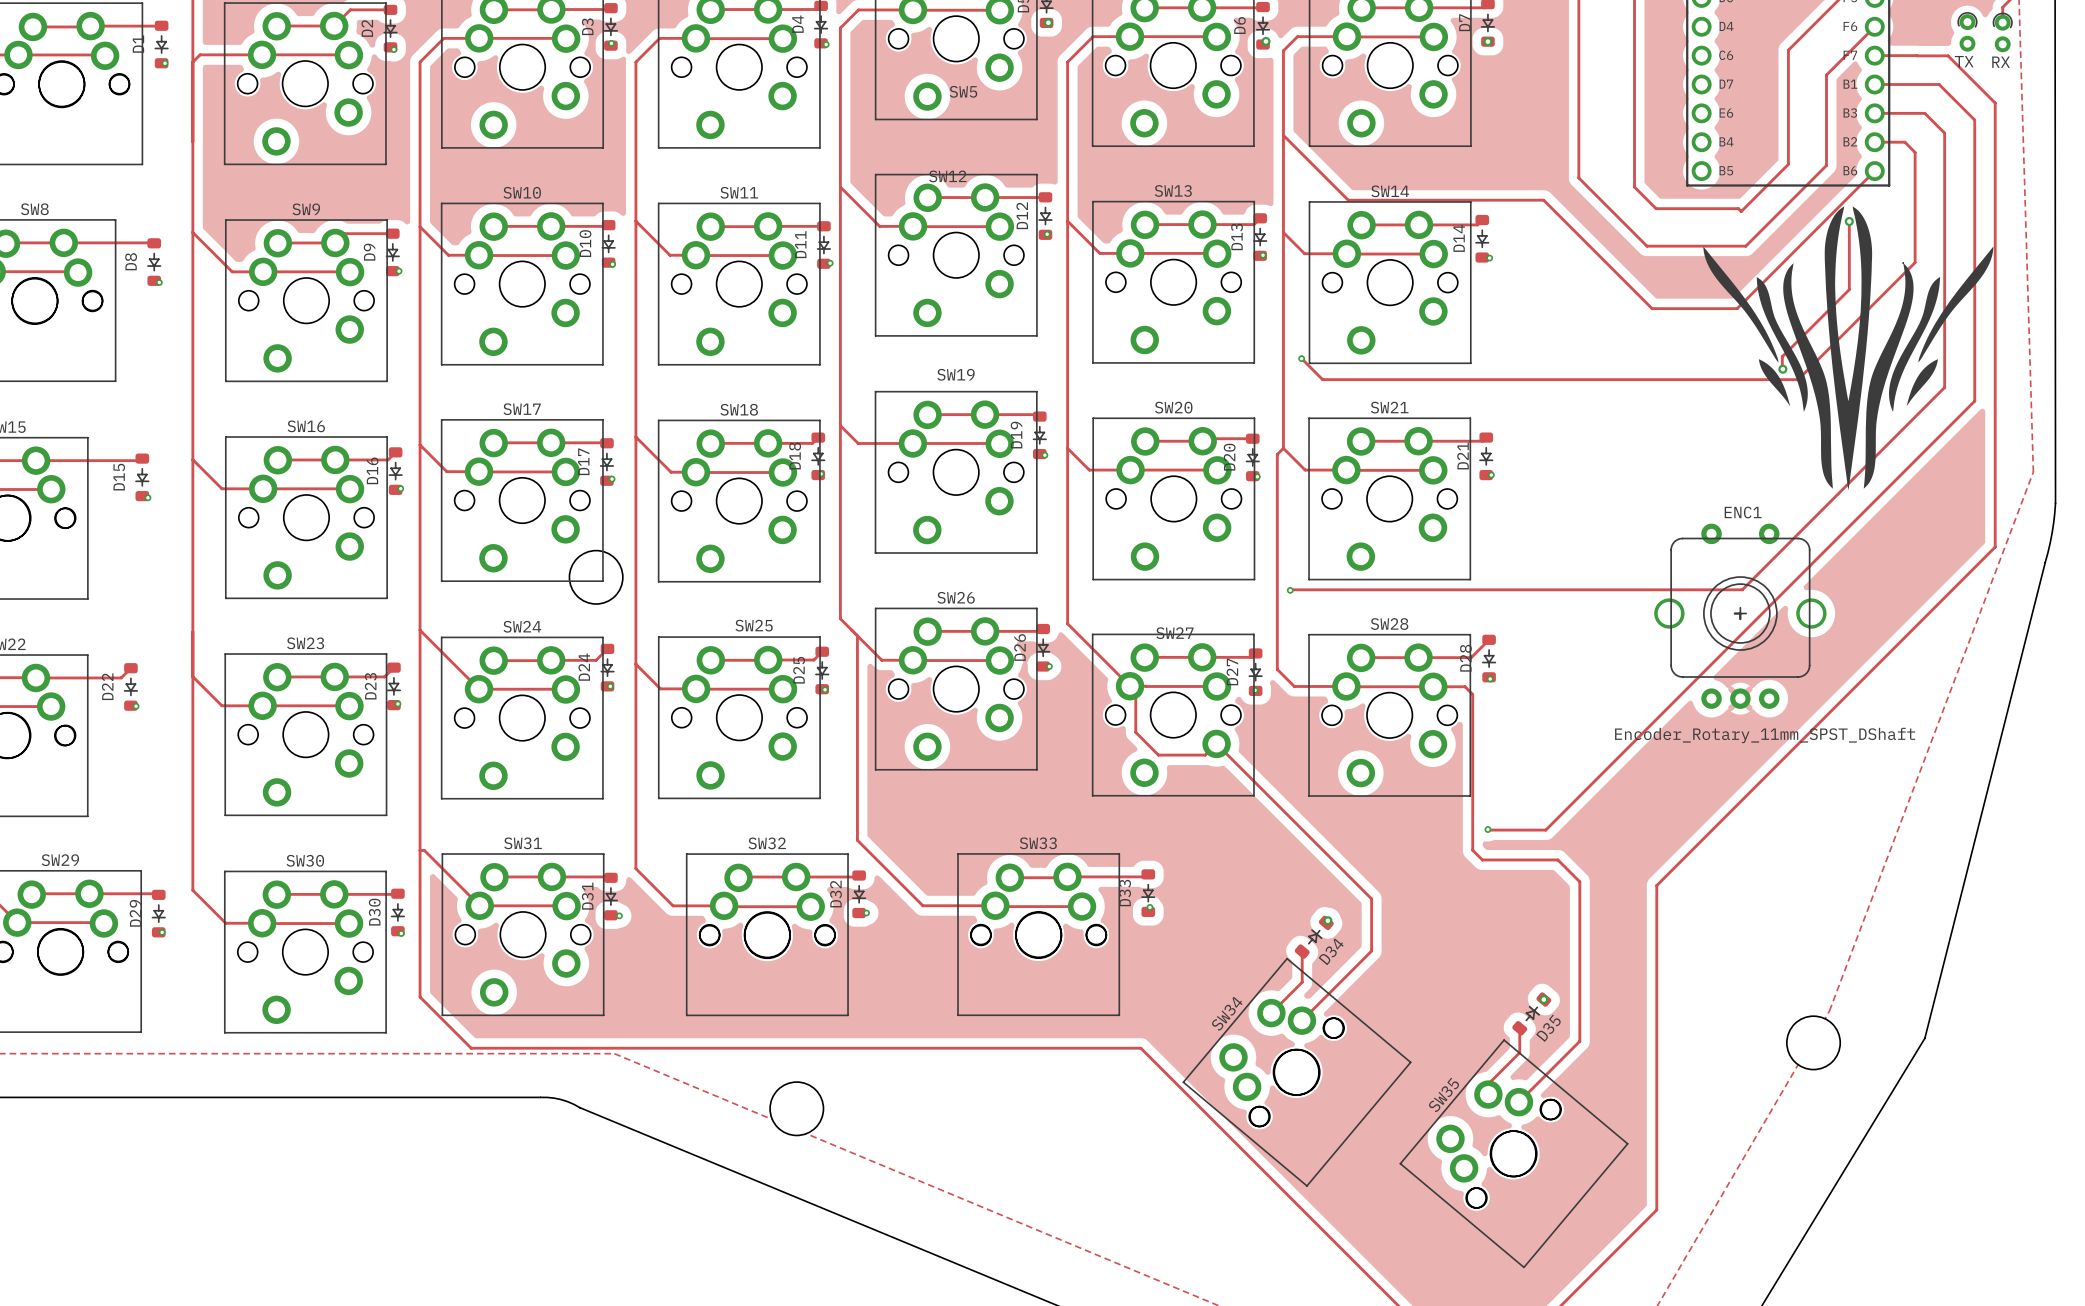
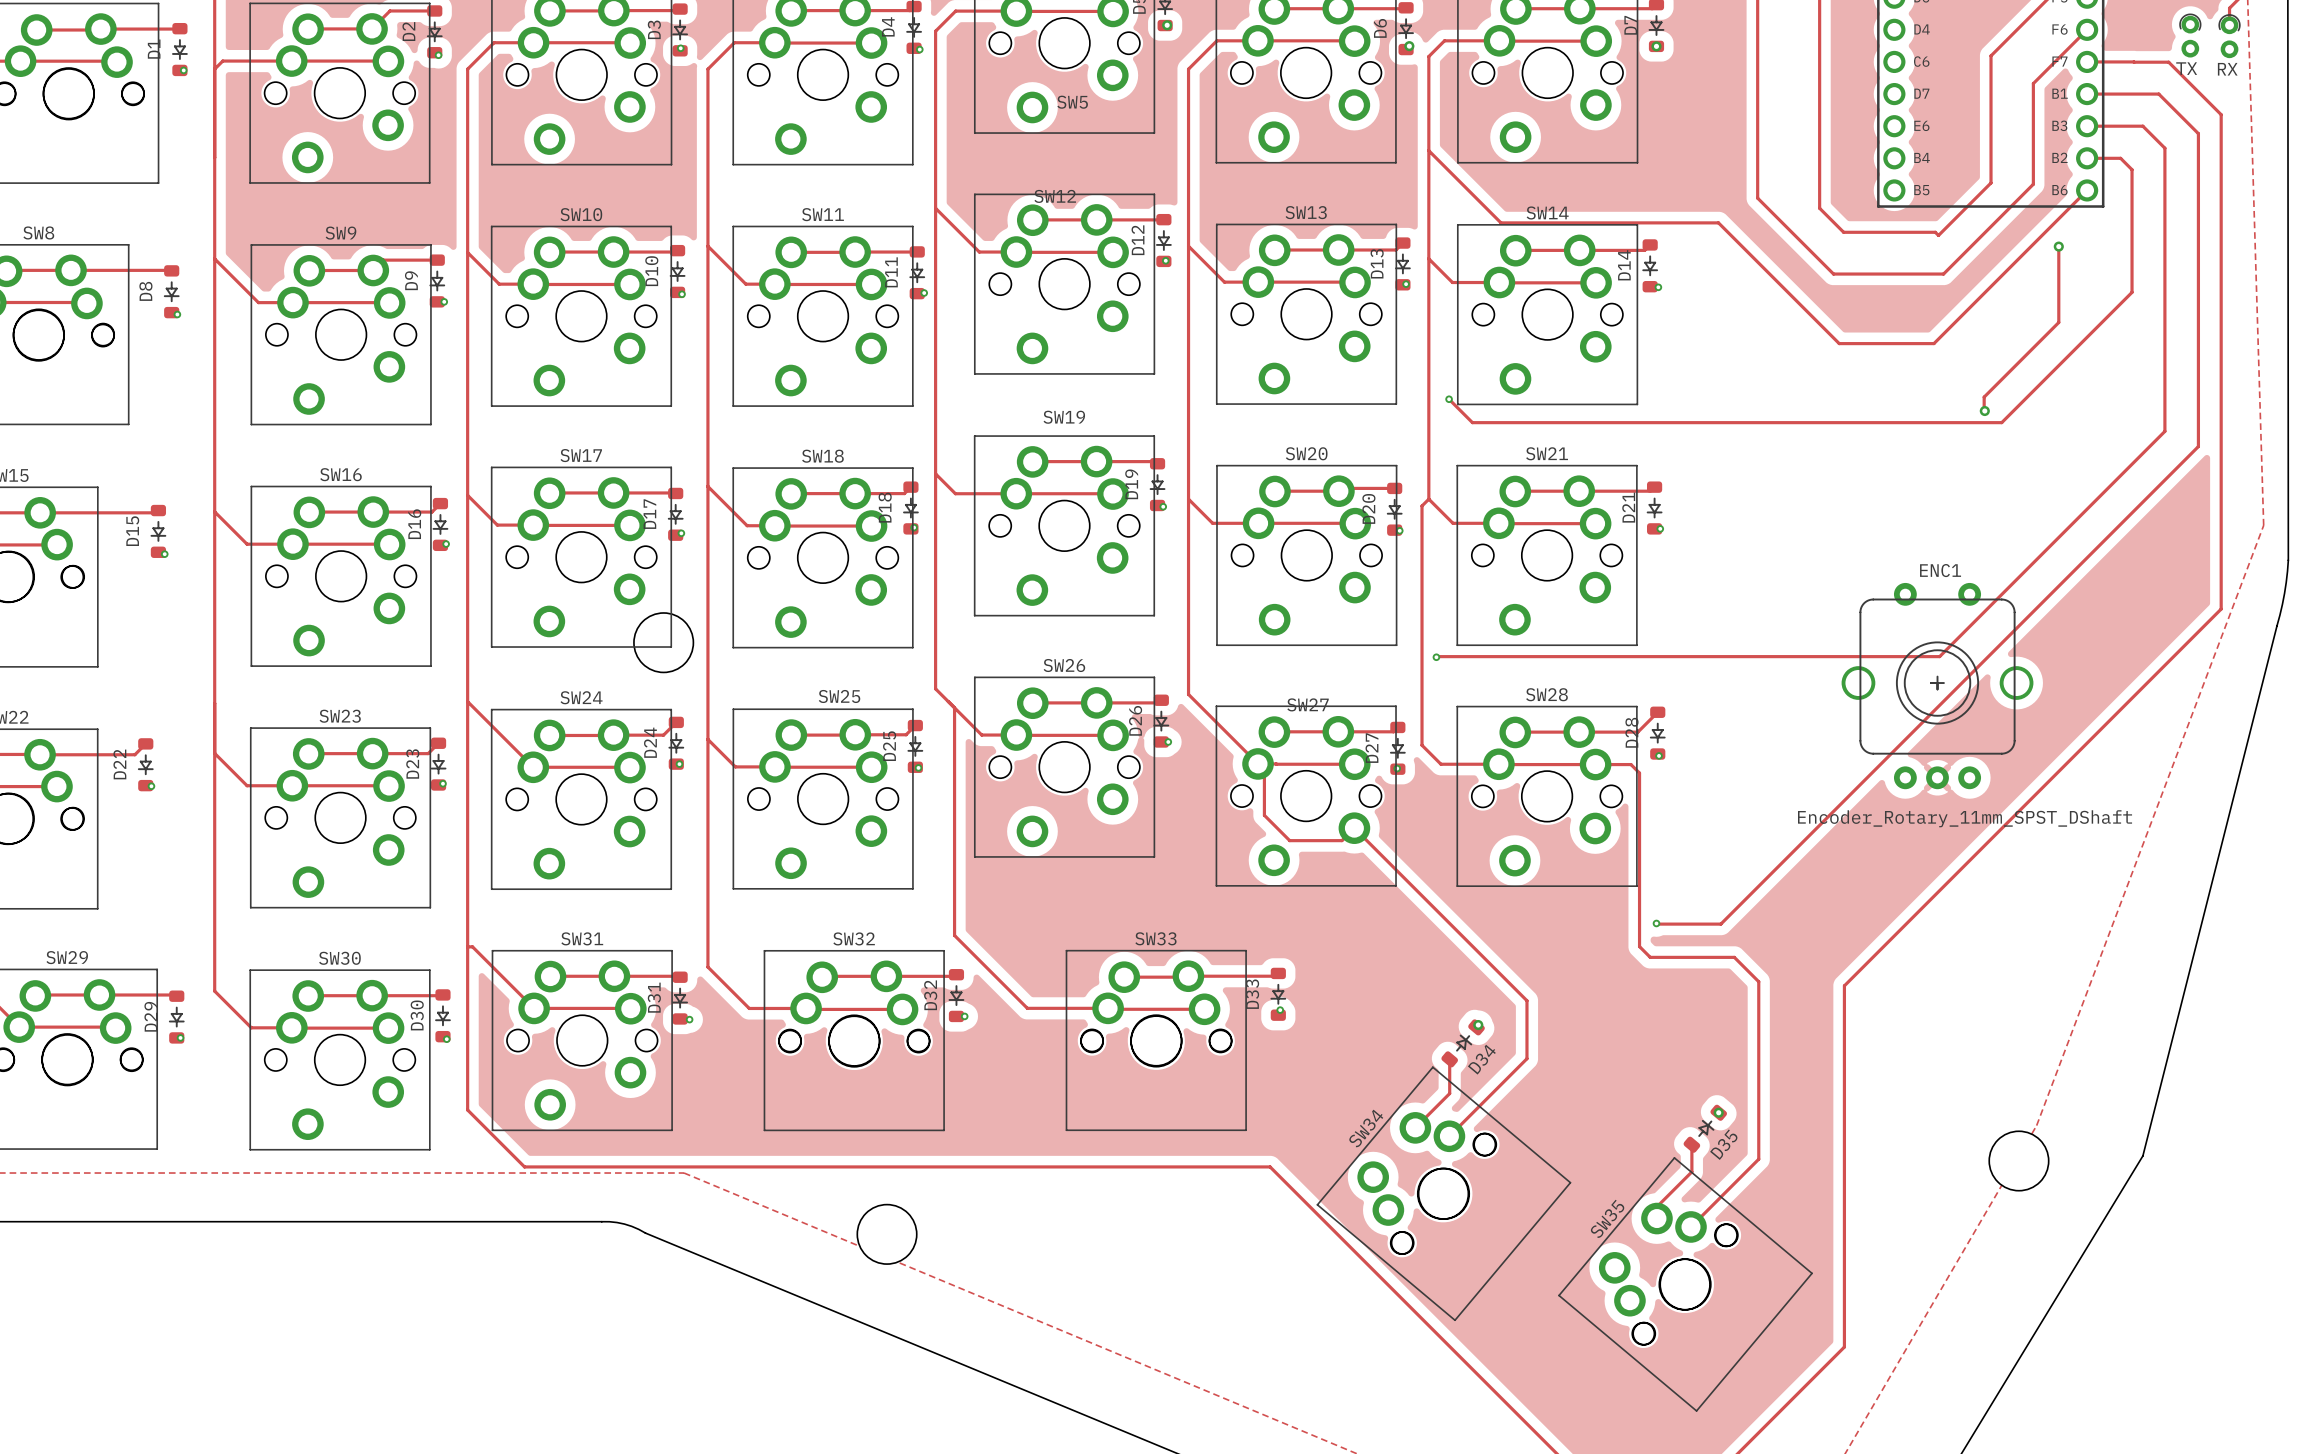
drawing: [1703, 206, 1994, 491] -> none

